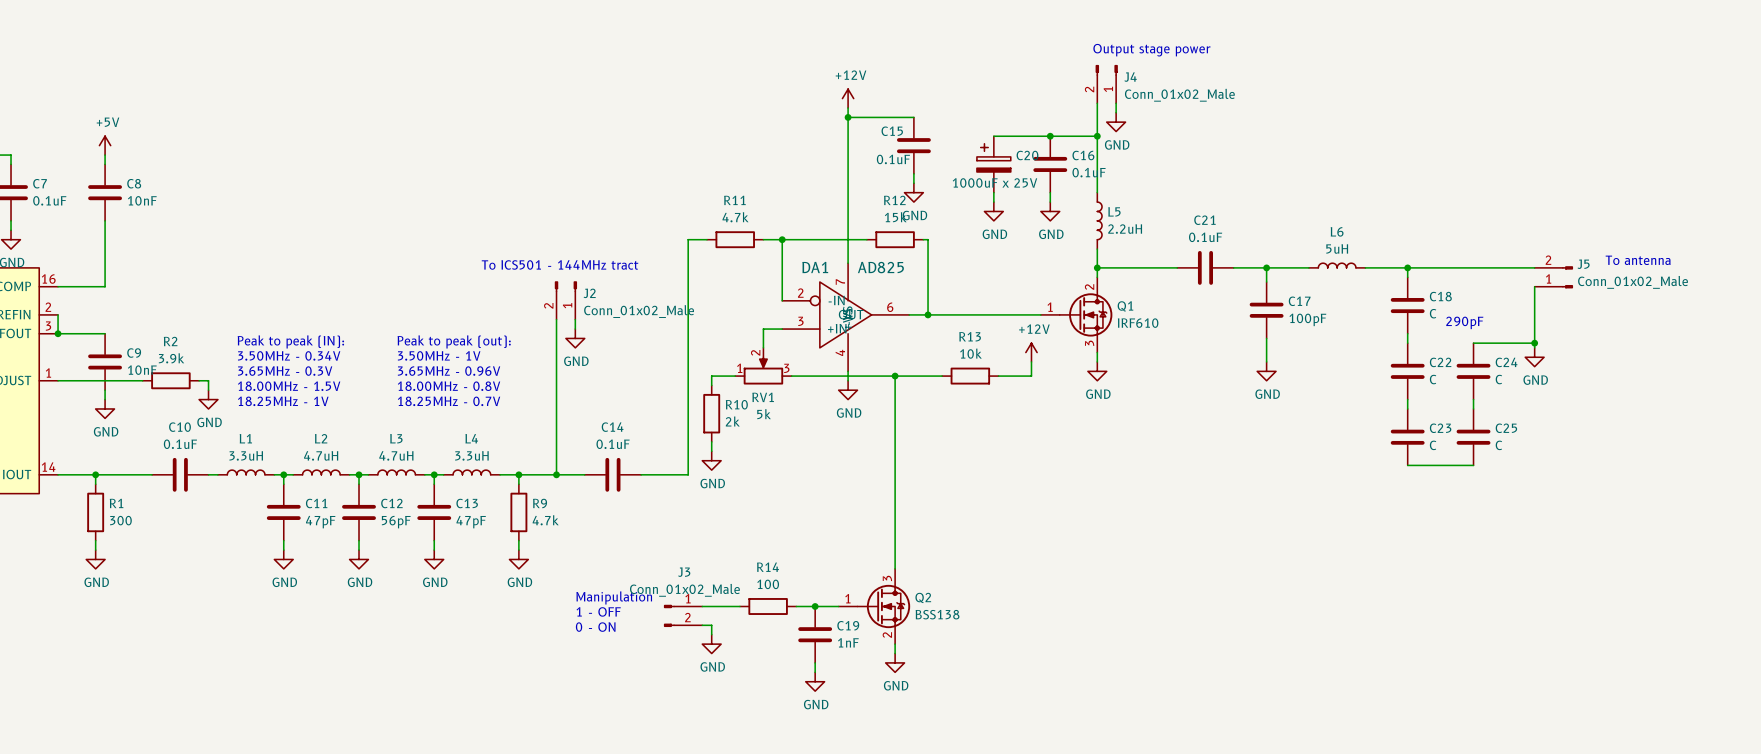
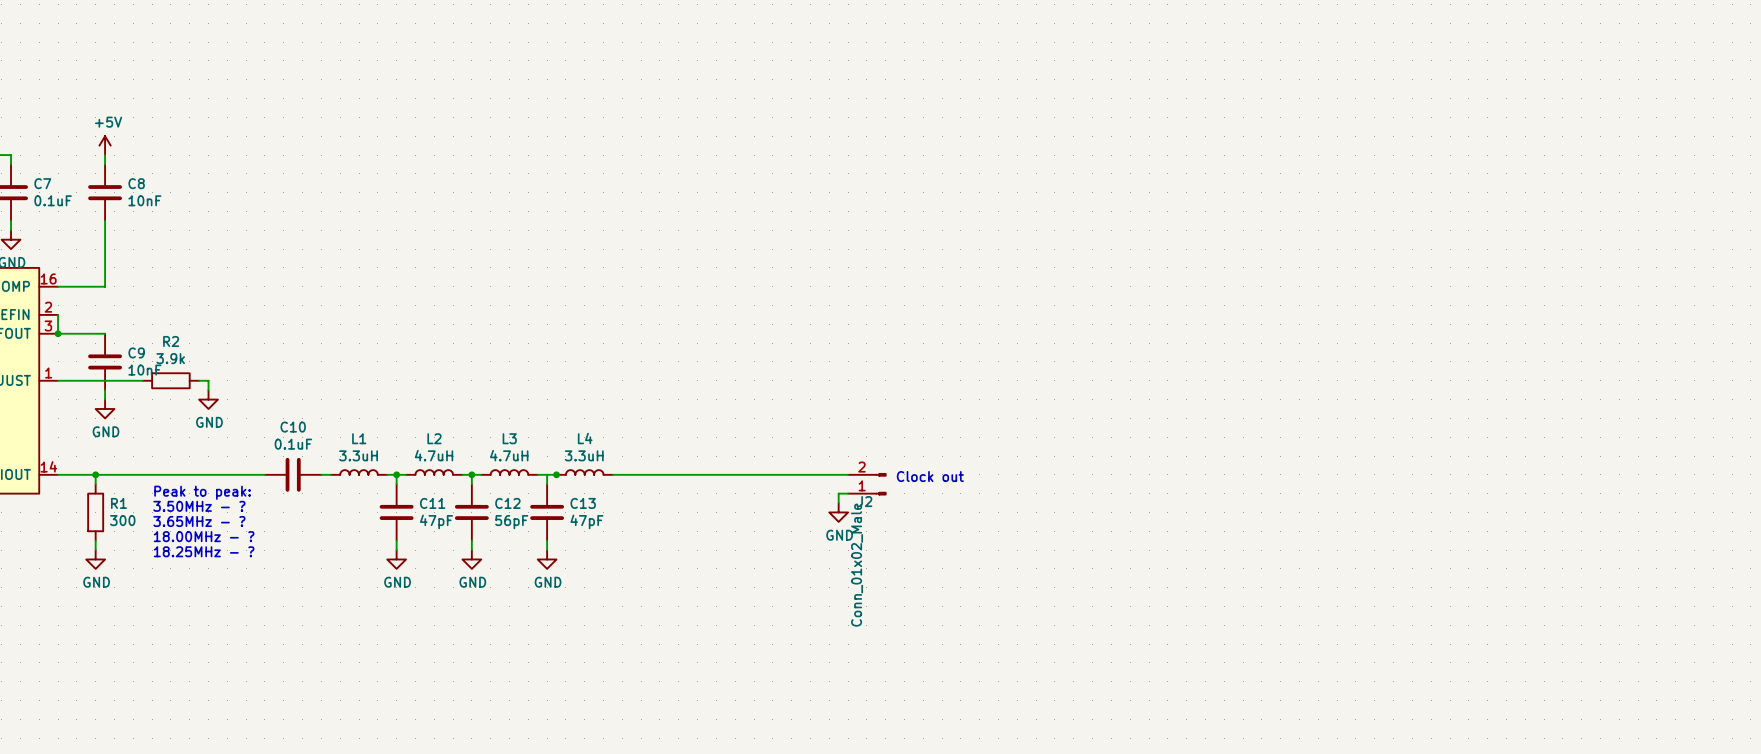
text: Output stage power (1151, 50) -> none
J4: Conn_01x02_Male (1106, 84) -> none
power symbol: +12V (848, 98) -> none
wire: (1097, 103) (1097, 192) -> none
wire: (1116, 103) (1116, 112) -> none
wire: (848, 108) (848, 263) -> none
wire: (848, 117) (913, 117) -> none
junction: (848, 117) -> none
power symbol: GND (1116, 122) -> none
wire: (993, 136) (1097, 136) -> none
junction: (1050, 136) -> none
junction: (1097, 136) -> none
C15: 0.1uF (913, 145) -> none
C20: 1000uF x 25V (993, 164) -> none
C16: 0.1uF (1050, 164) -> none
wire: (913, 173) (913, 183) -> none
power symbol: GND (913, 192) -> none
wire: (993, 192) (993, 202) -> none
wire: (1050, 192) (1050, 202) -> none
power symbol: GND (993, 211) -> none
power symbol: GND (1050, 211) -> none
L5: 2.2uH (1099, 220) -> none
wire: (707, 239) (688, 239) (688, 474) -> (848, 474) (688, 474)
R11: 4.7k (735, 239) -> none
wire: (763, 239) (866, 239) -> none
wire: (782, 239) (782, 300) -> none
junction: (782, 239) -> none
R12: 15k (895, 239) -> none
wire: (923, 239) (928, 239) (928, 314) -> none
wire: (1097, 249) (1097, 277) -> none
text: To antenna (1638, 260) -> none
text: To ICS501 - 144MHz tract (560, 264) -> none
L6: 5uH (1337, 265) -> none
wire: (1097, 267) (1177, 267) -> none
junction: (1097, 267) -> none
C21: 0.1uF (1205, 267) -> none
wire: (1233, 267) (1308, 267) -> none
wire: (1266, 267) (1266, 282) -> none
junction: (1266, 267) -> none
wire: (1365, 267) (1534, 267) -> none
wire: (1407, 267) (1407, 277) -> none
junction: (1407, 267) -> none
J5: Conn_01x02_Male (1553, 277) -> none
J2 rotation: 0° (565, 286) -> 90° clockwise (880, 484)
wire: (1534, 286) (1534, 347) -> none
J2 name position: J2 (589, 293) -> J2 (865, 501)
J2 position: (565, 300) -> (867, 484)
C18: C (1407, 305) -> none
C17: 100pF (1266, 310) -> none
wire: (909, 314) (1040, 314) -> none
junction: (928, 314) -> none
Q1: IRF610 (1076, 314) -> none
DA1: AD825 (845, 317) -> none
wire: (556, 319) (556, 474) (584, 474) -> none
wire: (575, 319) (575, 329) -> none
text: 290pF (1464, 322) -> none
wire: (782, 329) (763, 329) (763, 347) -> none
wire: (1407, 333) (1407, 343) -> none
power symbol: GND (575, 338) -> none
wire: (1266, 338) (1266, 361) -> none
text: Peak to peak (IN): (290, 341) -> none
text: Peak to peak (out): (454, 341) -> none
wire: (1473, 343) (1534, 343) -> none
junction: (1534, 343) -> none
power symbol: +12V (1031, 352) -> none
wire: (1097, 352) (1097, 361) -> none
text: 3.50MHz - 0.34V (289, 355) -> none
text: 3.50MHz - 1V (439, 355) -> none
power symbol: GND (1534, 357) -> none
wire: (1031, 361) (1031, 376) (998, 376) -> none
RV1: 5k (763, 366) -> none
text: 3.65MHz - 0.3V (285, 371) -> none
text: 3.65MHz - 0.96V (449, 371) -> none
wire: (848, 371) (848, 380) -> none
power symbol: GND (1097, 371) -> none
power symbol: GND (1266, 371) -> none
C22: C (1407, 371) -> none
C24: C (1473, 371) -> none
wire: (735, 376) (711, 376) (711, 385) -> none
wire: (791, 376) (942, 376) -> none
wire: (895, 376) (895, 568) -> none
junction: (895, 376) -> none
R13: 10k (970, 376) -> none
text: 18.00MHz - 1.5V (289, 386) -> none
text: 18.00MHz - 0.8V (449, 386) -> none
power symbol: GND (848, 390) -> none
wire: (1407, 399) (1407, 408) -> none
wire: (1473, 399) (1473, 408) -> none
text: 18.25MHz - 1V (283, 401) -> none
text: 18.25MHz - 0.7V (449, 401) -> none
R10: 2k (711, 413) -> none
C23: C (1407, 437) -> none
C25: C (1473, 437) -> none
wire: (711, 441) (711, 451) -> none
power symbol: GND (711, 460) -> none
wire: (1407, 465) (1473, 465) -> none
L1 position: (246, 472) -> (359, 472)
L2 position: (321, 472) -> (434, 472)
L3 position: (396, 472) -> (509, 472)
L4 position: (471, 472) -> (584, 472)
C10 position: (180, 474) -> (293, 474)
wire: none -> (217, 474) (264, 474)
wire: (283, 474) (283, 484) -> (396, 474) (396, 484)
junction: (283, 474) -> none
wire: none -> (321, 474) (330, 474)
wire: (349, 474) (368, 474) -> (462, 474) (481, 474)
wire: (359, 474) (359, 484) -> (471, 474) (471, 484)
junction: (359, 474) -> none
junction: none -> (396, 474)
wire: (424, 474) (443, 474) -> none
wire: (434, 474) (434, 484) -> (547, 474) (547, 484)
junction: (434, 474) -> none
junction: none -> (471, 474)
wire: (500, 474) (537, 474) -> none
wire: (518, 474) (518, 484) -> none
junction: (518, 474) -> none
C14: 0.1uF (612, 474) -> none
text: none -> Clock out (930, 476)
text: none -> Peak to peak: (202, 492)
wire: none -> (848, 493) (838, 493) (838, 503)
text: none -> 3.50MHz - ? (199, 506)
C11 position: (283, 512) -> (396, 512)
C12 position: (359, 512) -> (471, 512)
C13 position: (434, 512) -> (547, 512)
R9: 4.7k (518, 512) -> none
power symbol: none -> GND (838, 512)
text: none -> 3.65MHz - ? (199, 521)
text: none -> 18.00MHz - ? (204, 536)
wire: (283, 540) (283, 550) -> (396, 540) (396, 550)
wire: (359, 540) (359, 550) -> (471, 540) (471, 550)
wire: (434, 540) (434, 550) -> (547, 540) (547, 550)
wire: (518, 540) (518, 550) -> none
text: none -> 18.25MHz - ? (204, 551)
power symbol: GND (283, 559) -> none
power symbol: GND (359, 559) -> none
power symbol: none -> GND (396, 559)
power symbol: GND (434, 559) -> none
power symbol: none -> GND (471, 559)
power symbol: GND (518, 559) -> none
power symbol: none -> GND (547, 559)
text: Manipulation (614, 597) -> none
wire: (702, 606) (739, 606) -> none
R14: 100 (768, 606) -> none
wire: (796, 606) (838, 606) -> none
junction: (815, 606) -> none
Q2: BSS138 (874, 606) -> none
text: 1 - OFF (598, 611) -> none
J3: Conn_01x02_Male (683, 615) -> none
wire: (702, 625) (711, 625) (711, 634) -> none
text: 0 - ON (595, 627) -> none
C19: 1nF (815, 634) -> none
power symbol: GND (711, 644) -> none
wire: (895, 644) (895, 653) -> none
wire: (815, 662) (815, 672) -> none
power symbol: GND (895, 662) -> none
power symbol: GND (815, 681) -> none

